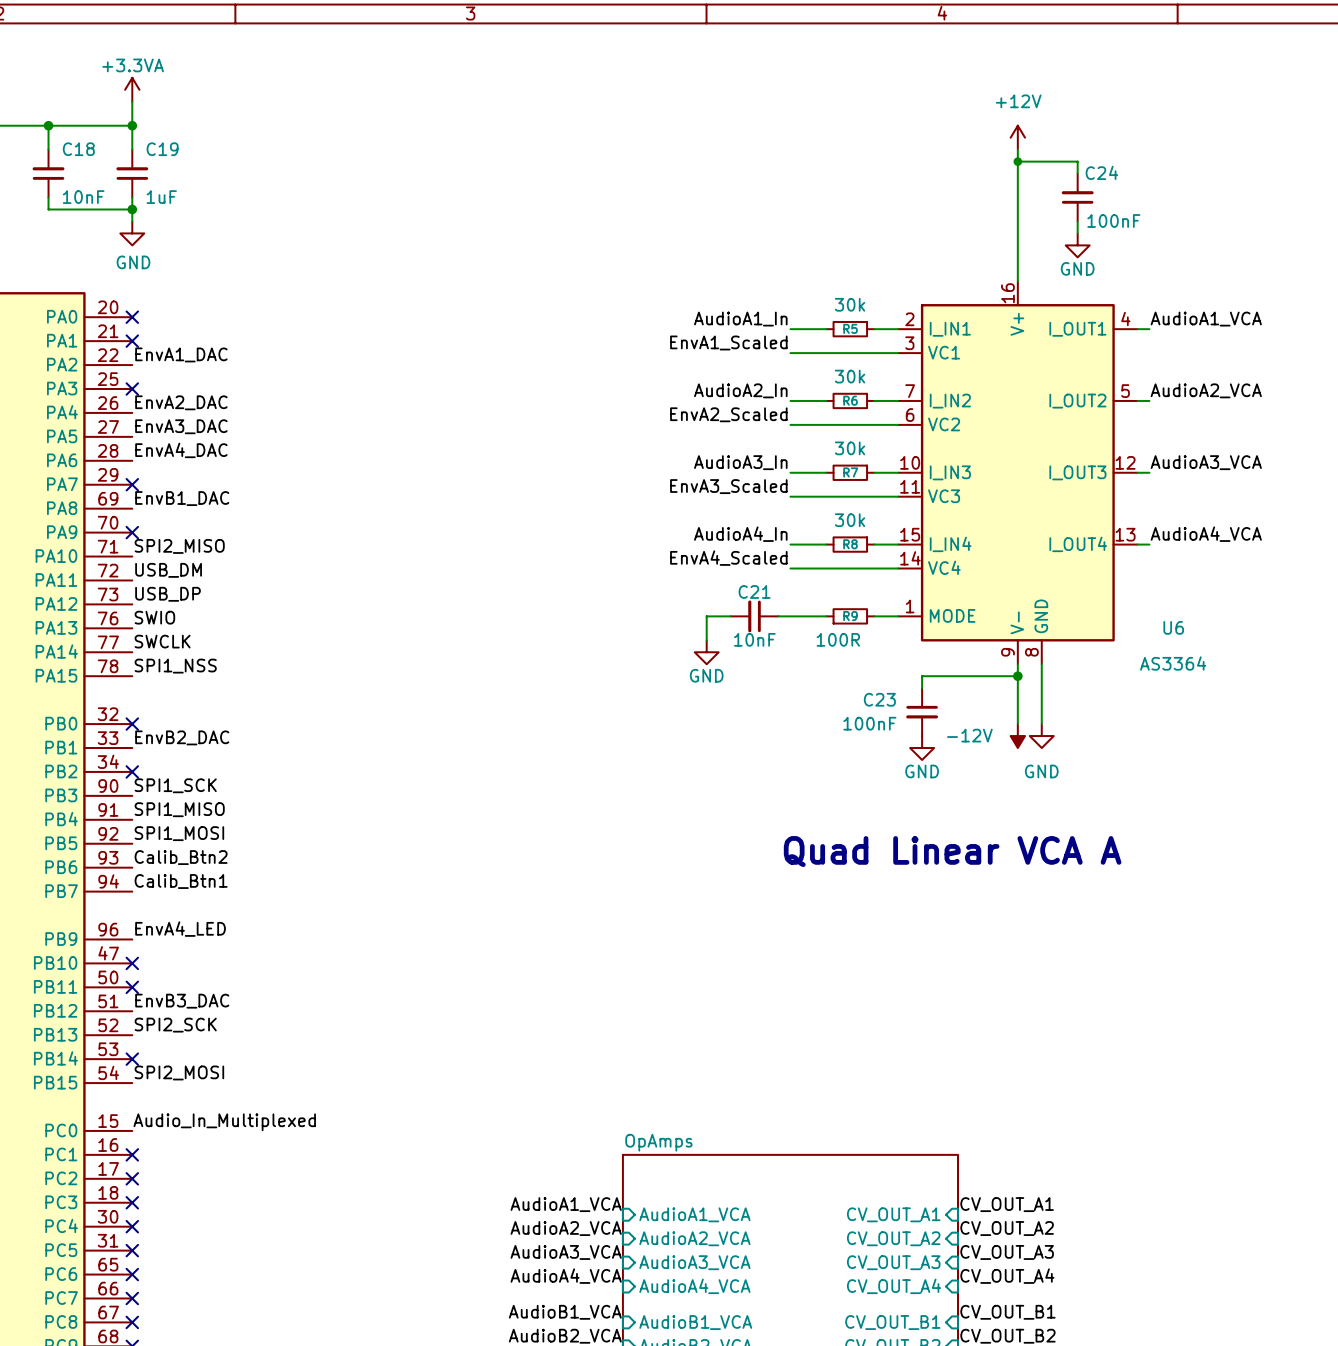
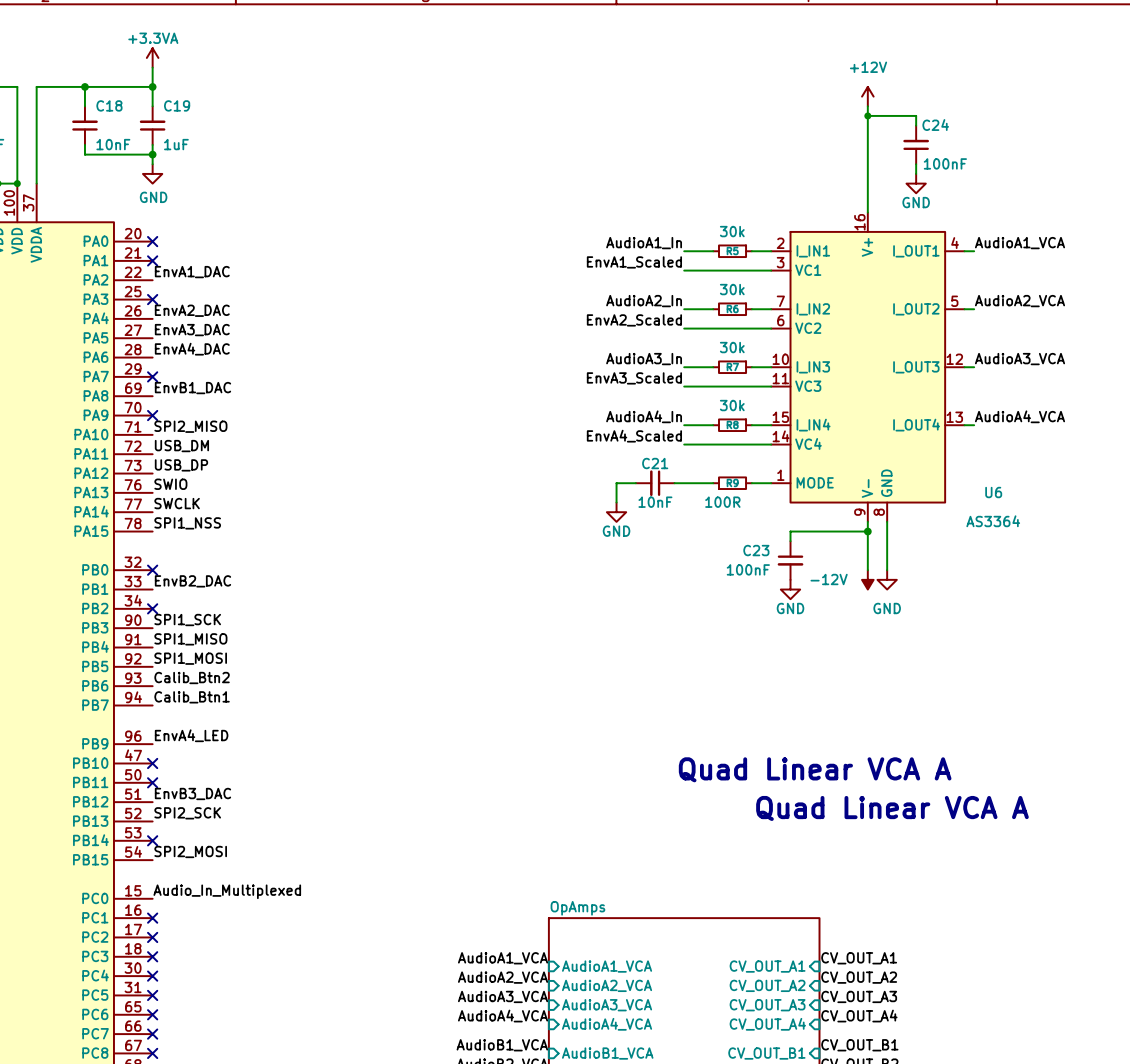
text: Quad Linear VCA A (952, 851) -> none
text: none -> Quad Linear VCA A (815, 769)
text: none -> Quad Linear VCA A (892, 808)

